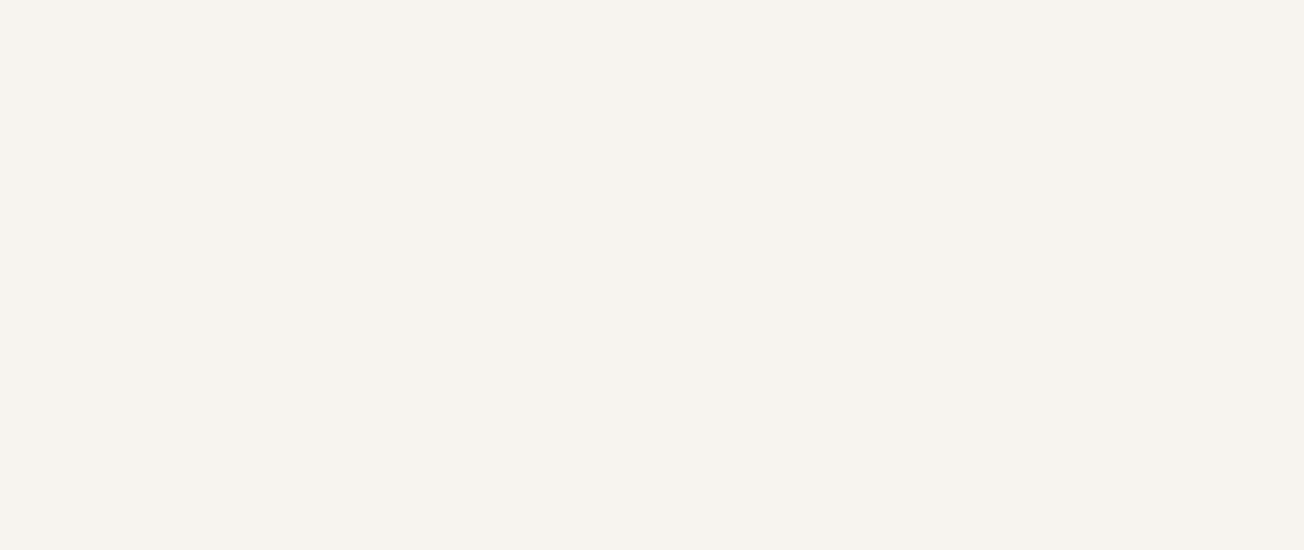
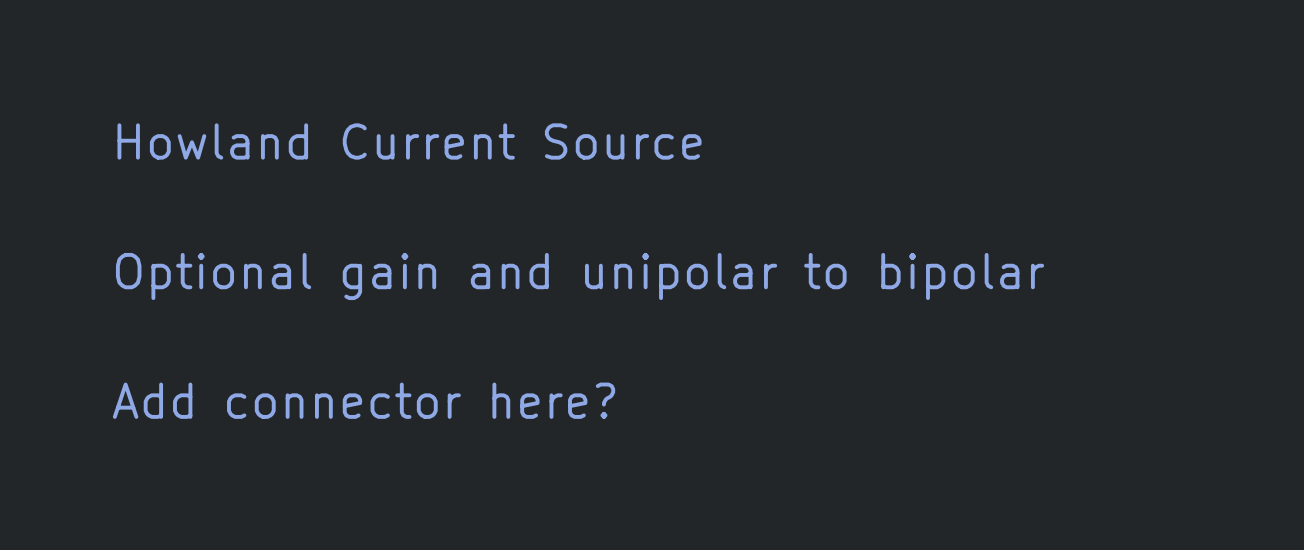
text: none -> Howland Current Source (409, 141)
text: none -> Optional gain and unipolar to bipolar (580, 276)
text: none -> Add connector here? (364, 400)

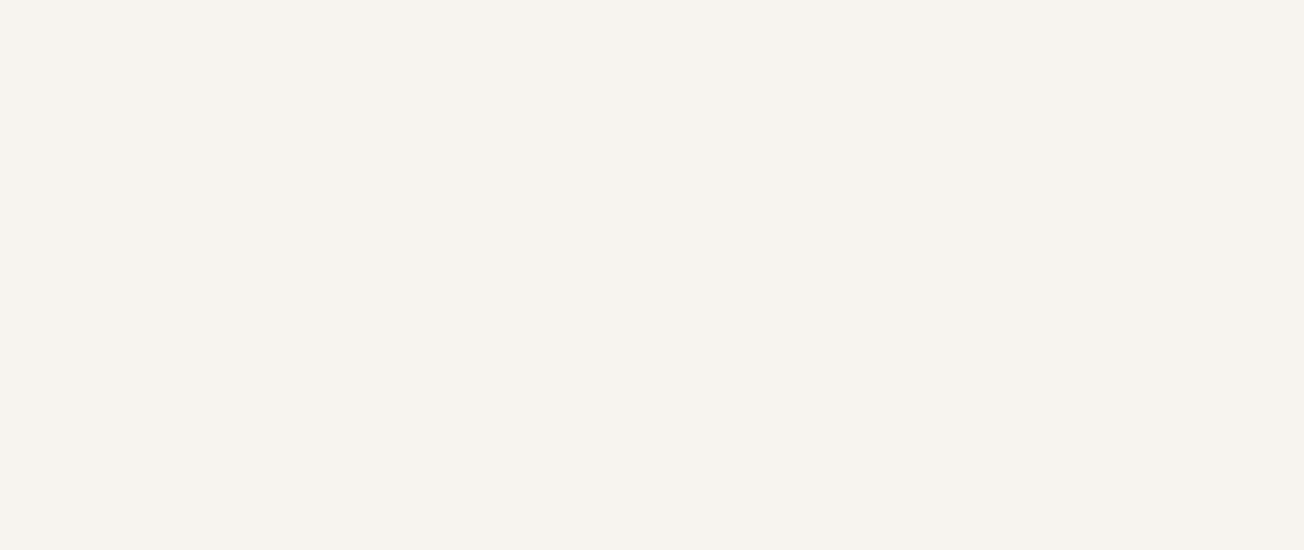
text: Howland Current Source (409, 141) -> none
text: Optional gain and unipolar to bipolar (580, 276) -> none
text: Add connector here? (364, 400) -> none

